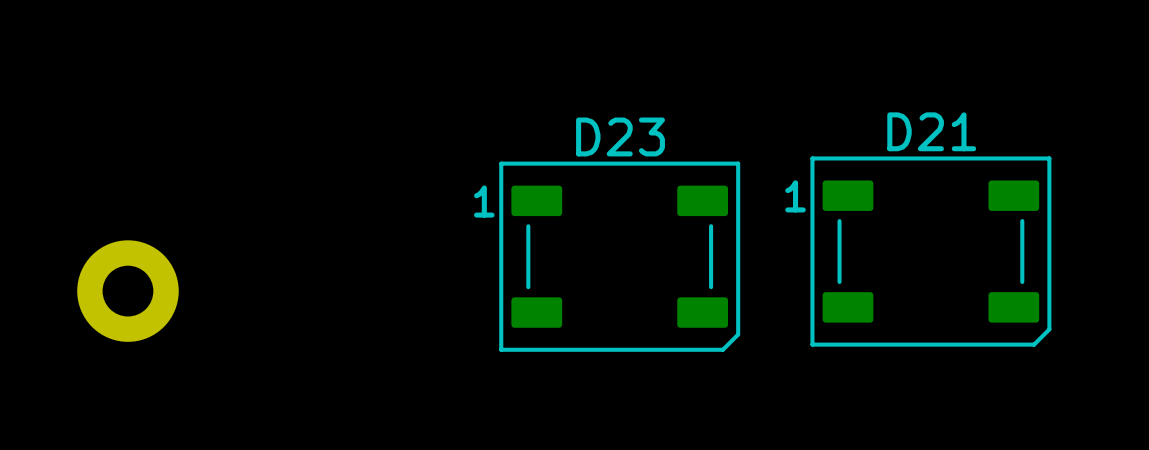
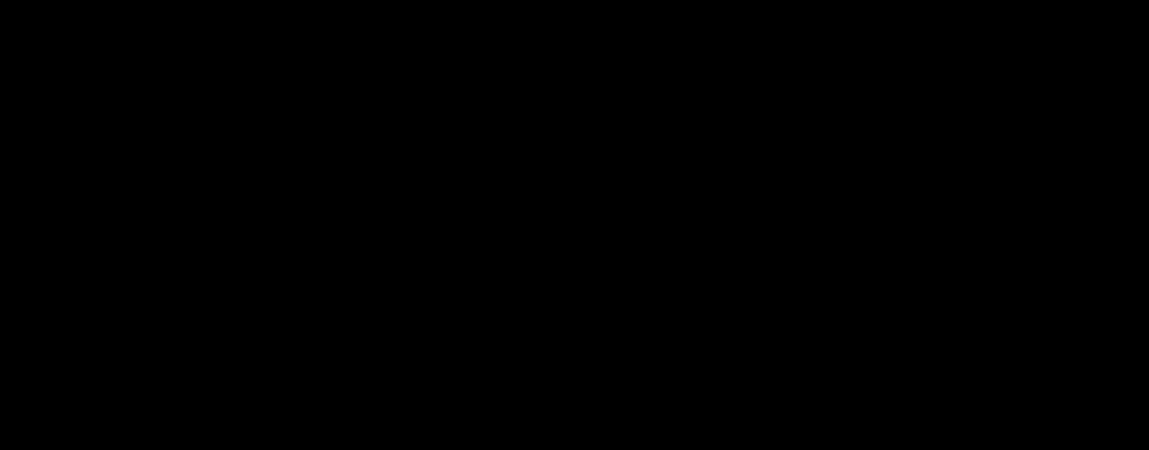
D21: (930, 251) -> none
D23: (619, 256) -> none
part: (127, 291) -> none

